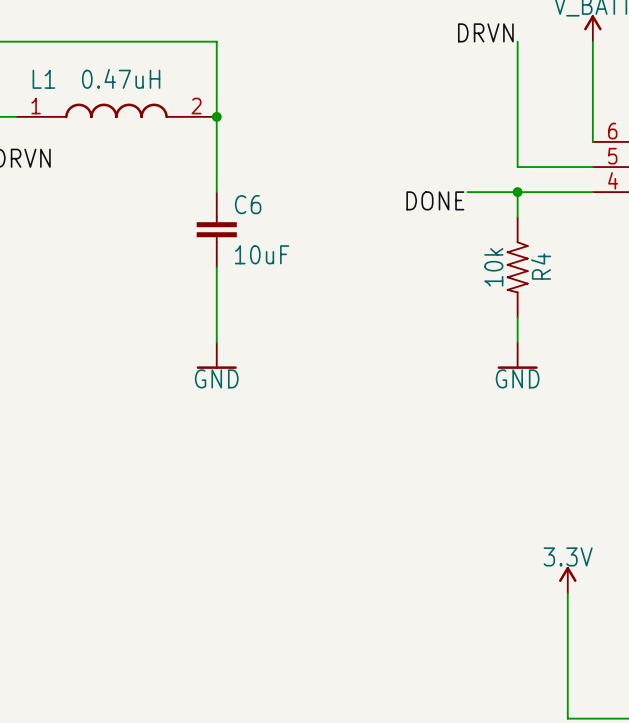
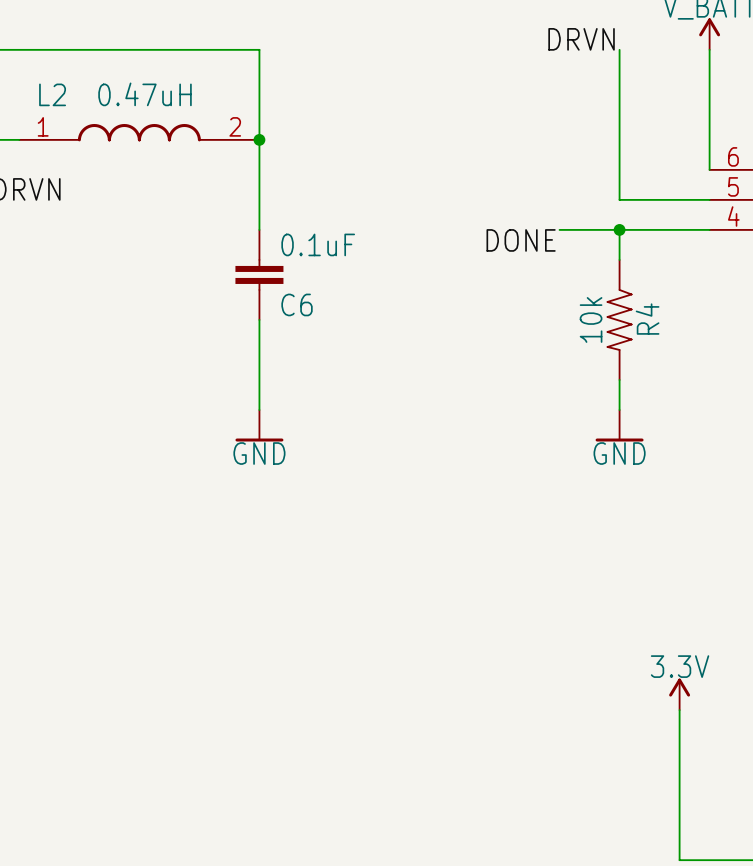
L1 name: L1 (43, 79) -> L2 (52, 94)
C6 name position: C6 (248, 204) -> C6 (297, 304)
C6 value: 10uF (262, 254) -> 0.1uF (318, 244)

